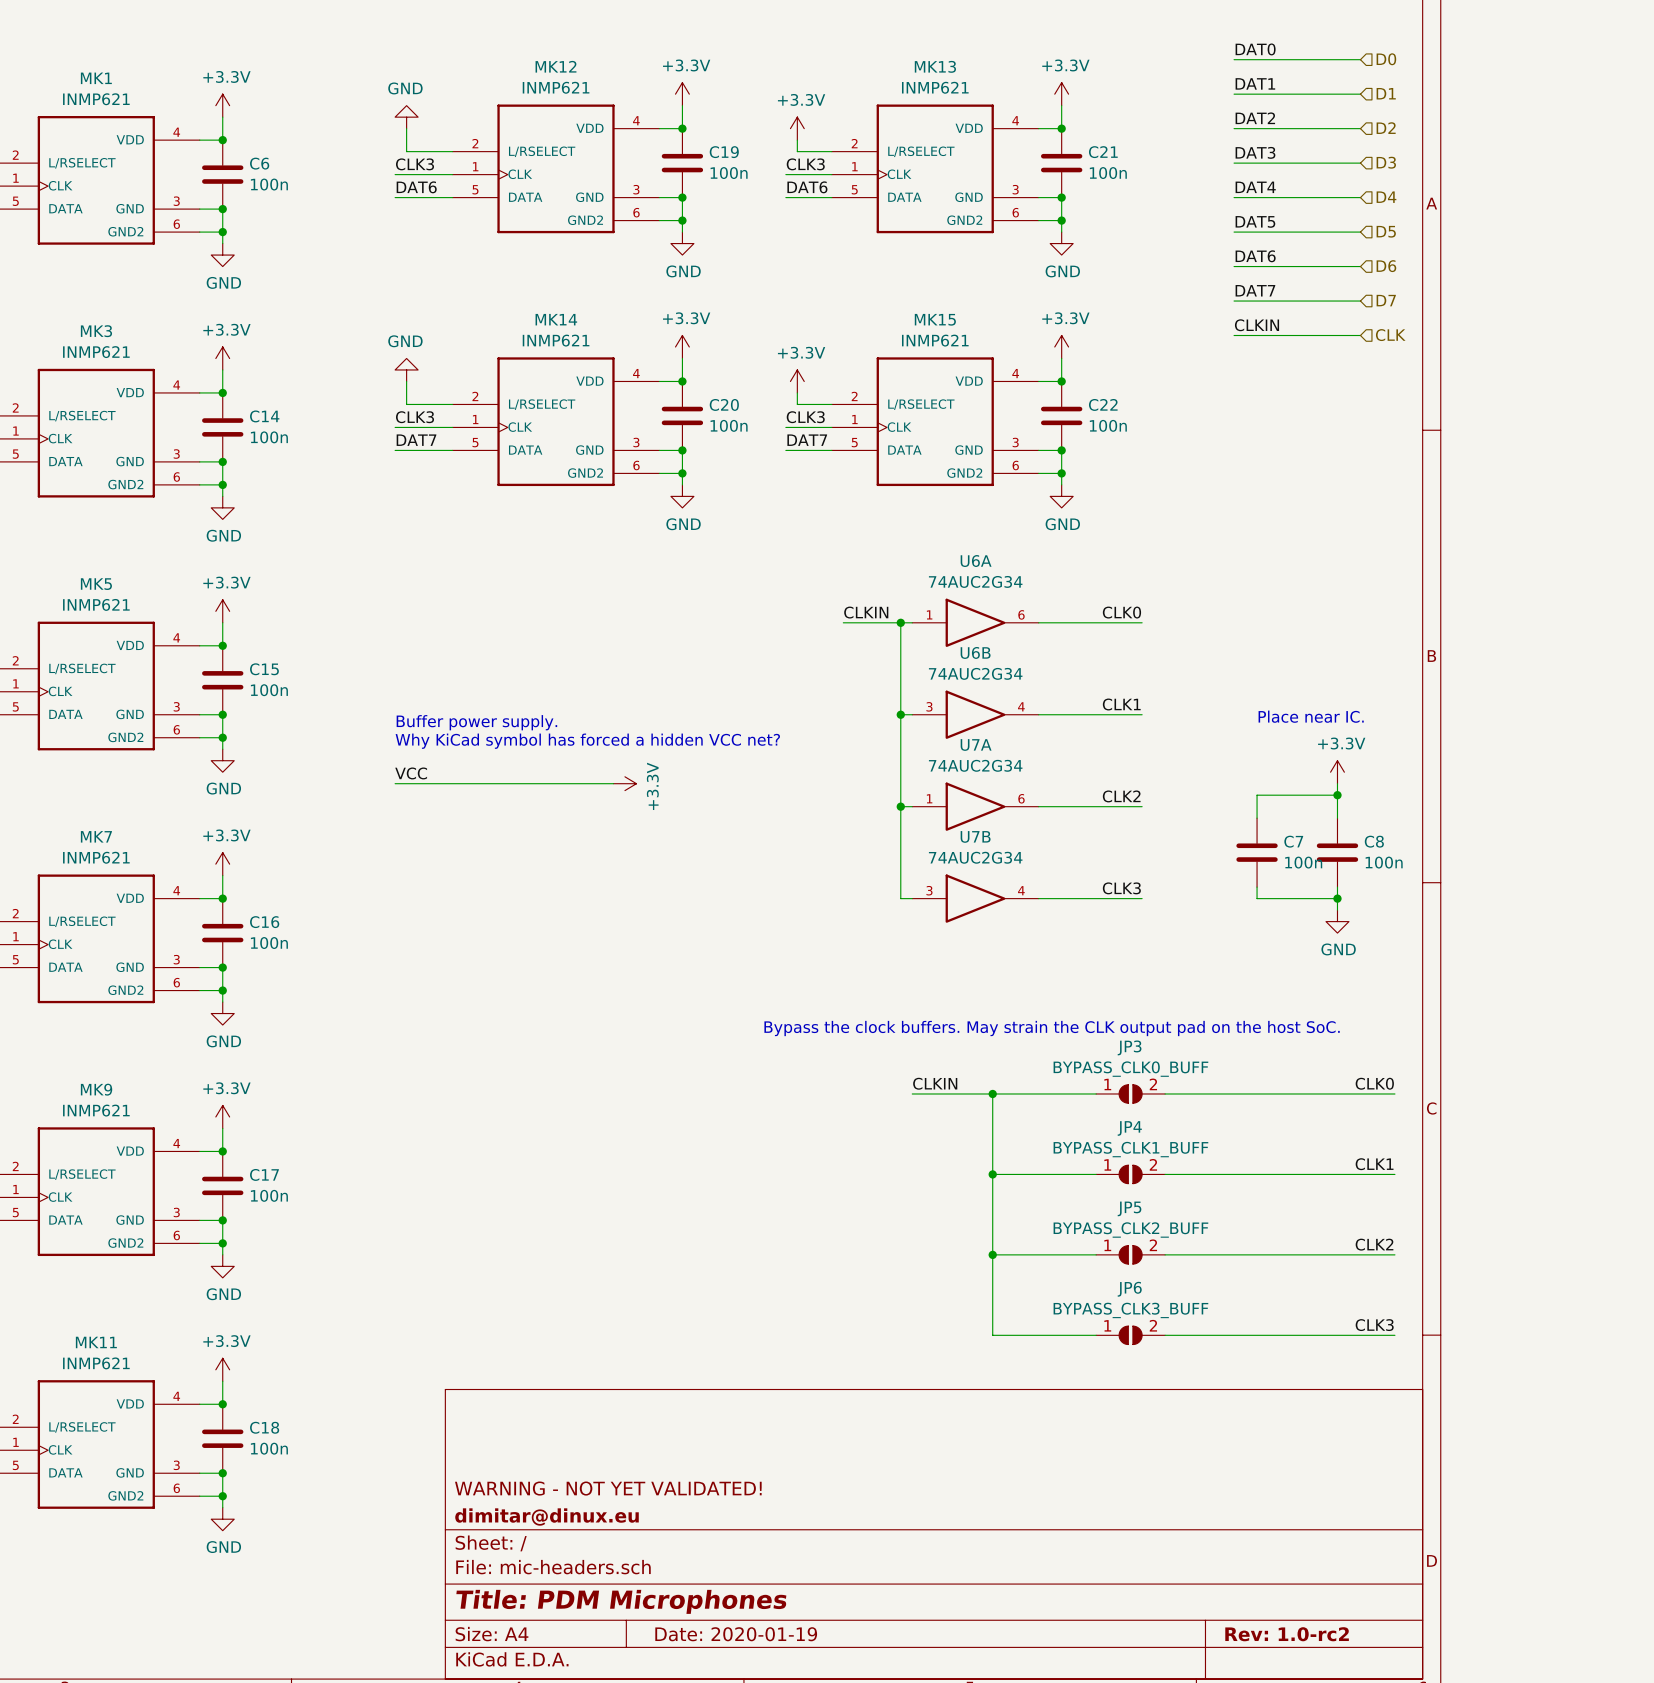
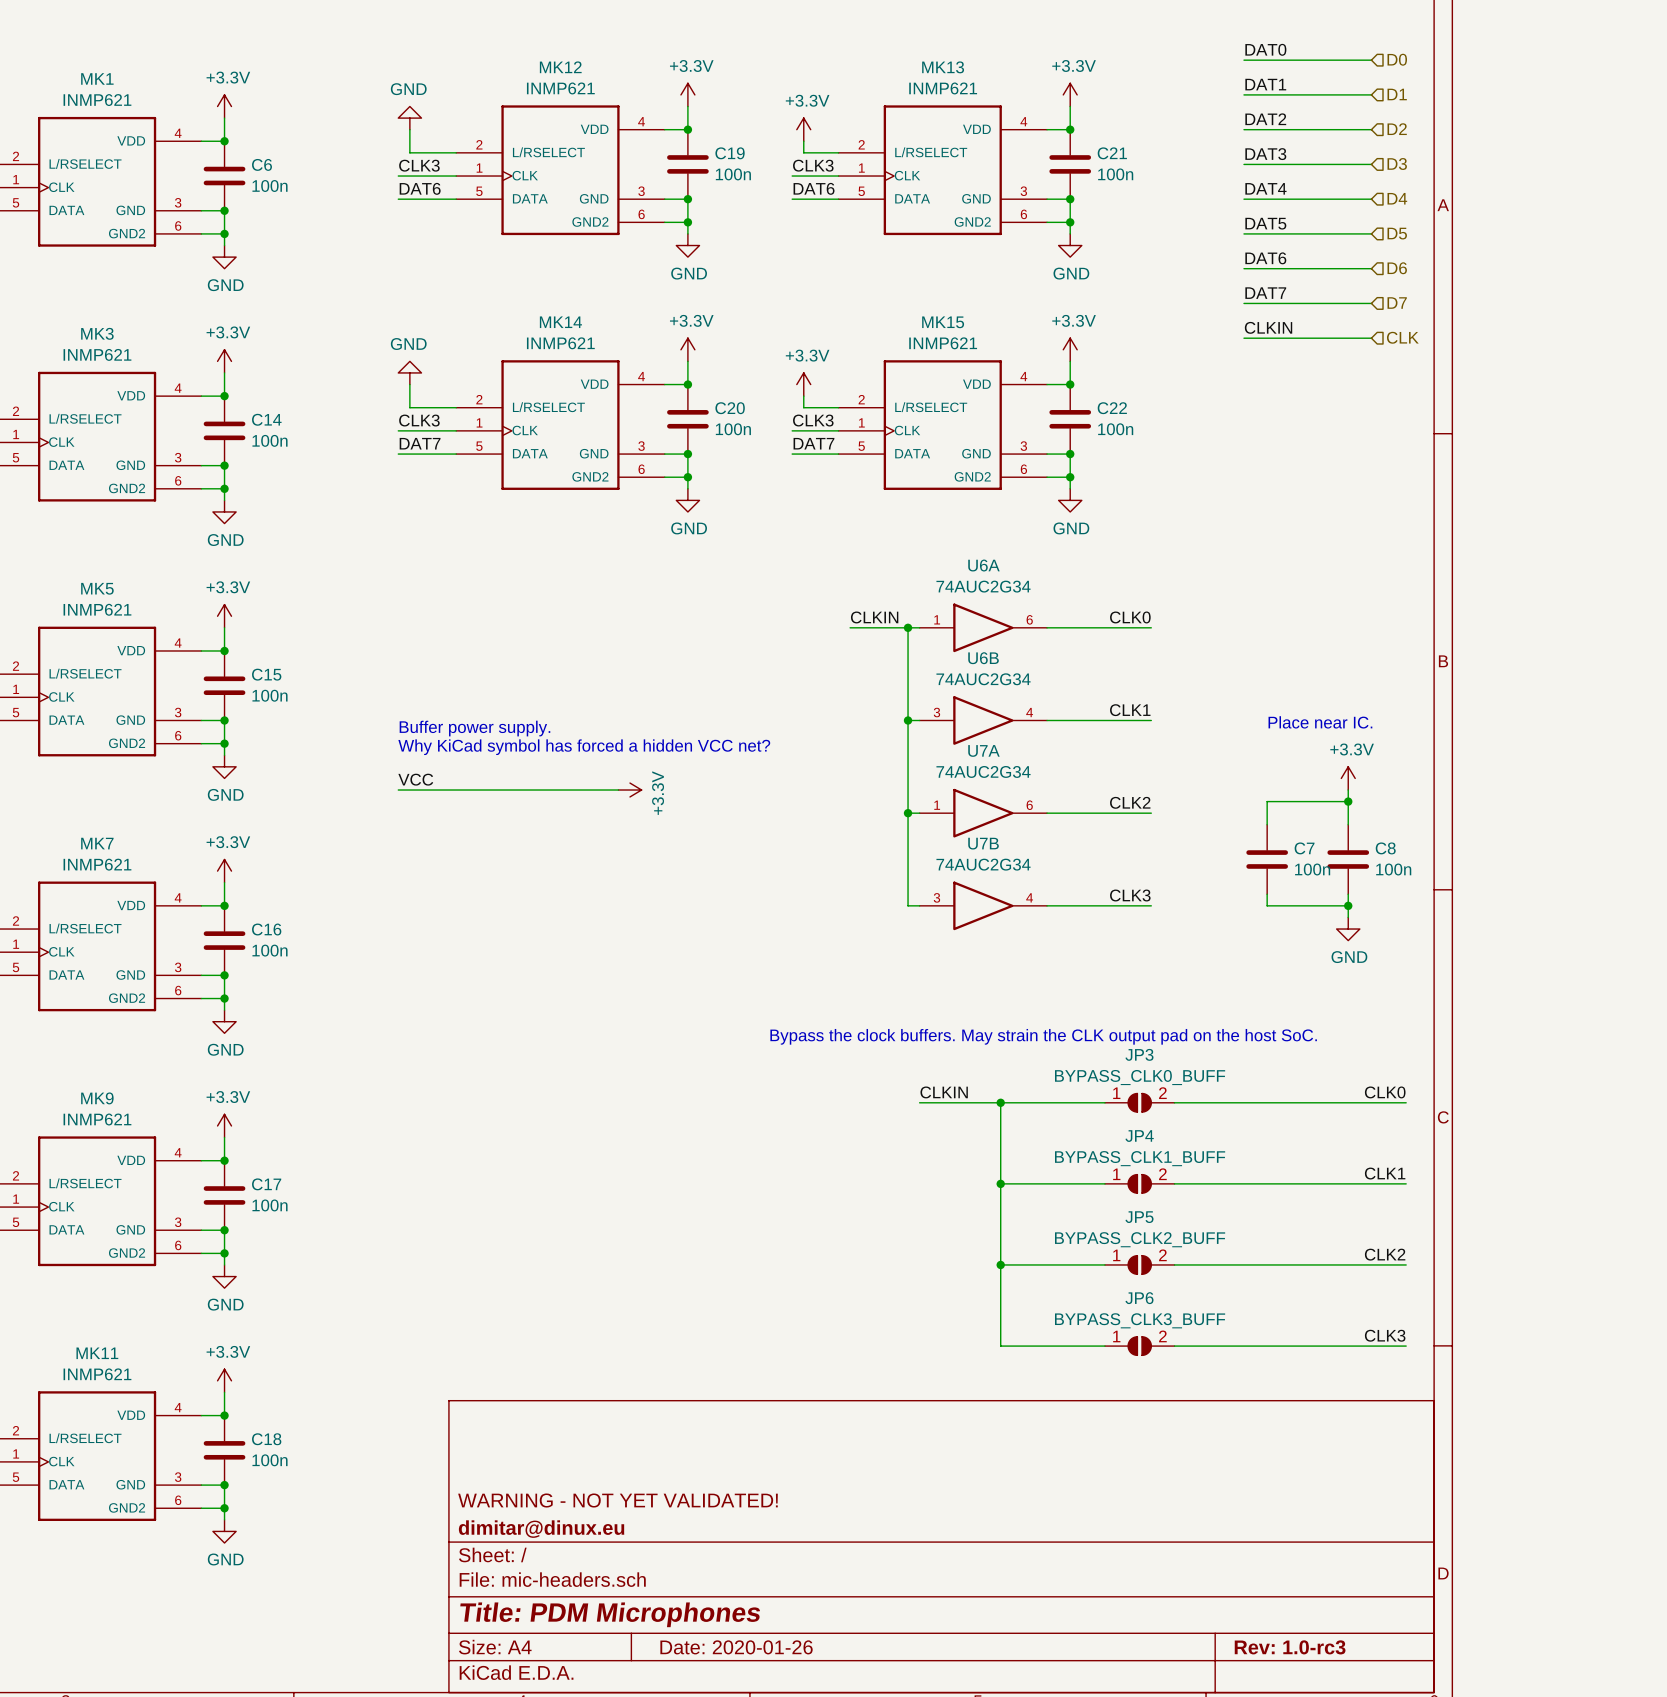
title block: Date: 2020-01-19 (736, 1634) -> Date: 2020-01-26 (736, 1647)
title block: Rev: 1.0-rc2 (1287, 1634) -> Rev: 1.0-rc3 (1290, 1647)

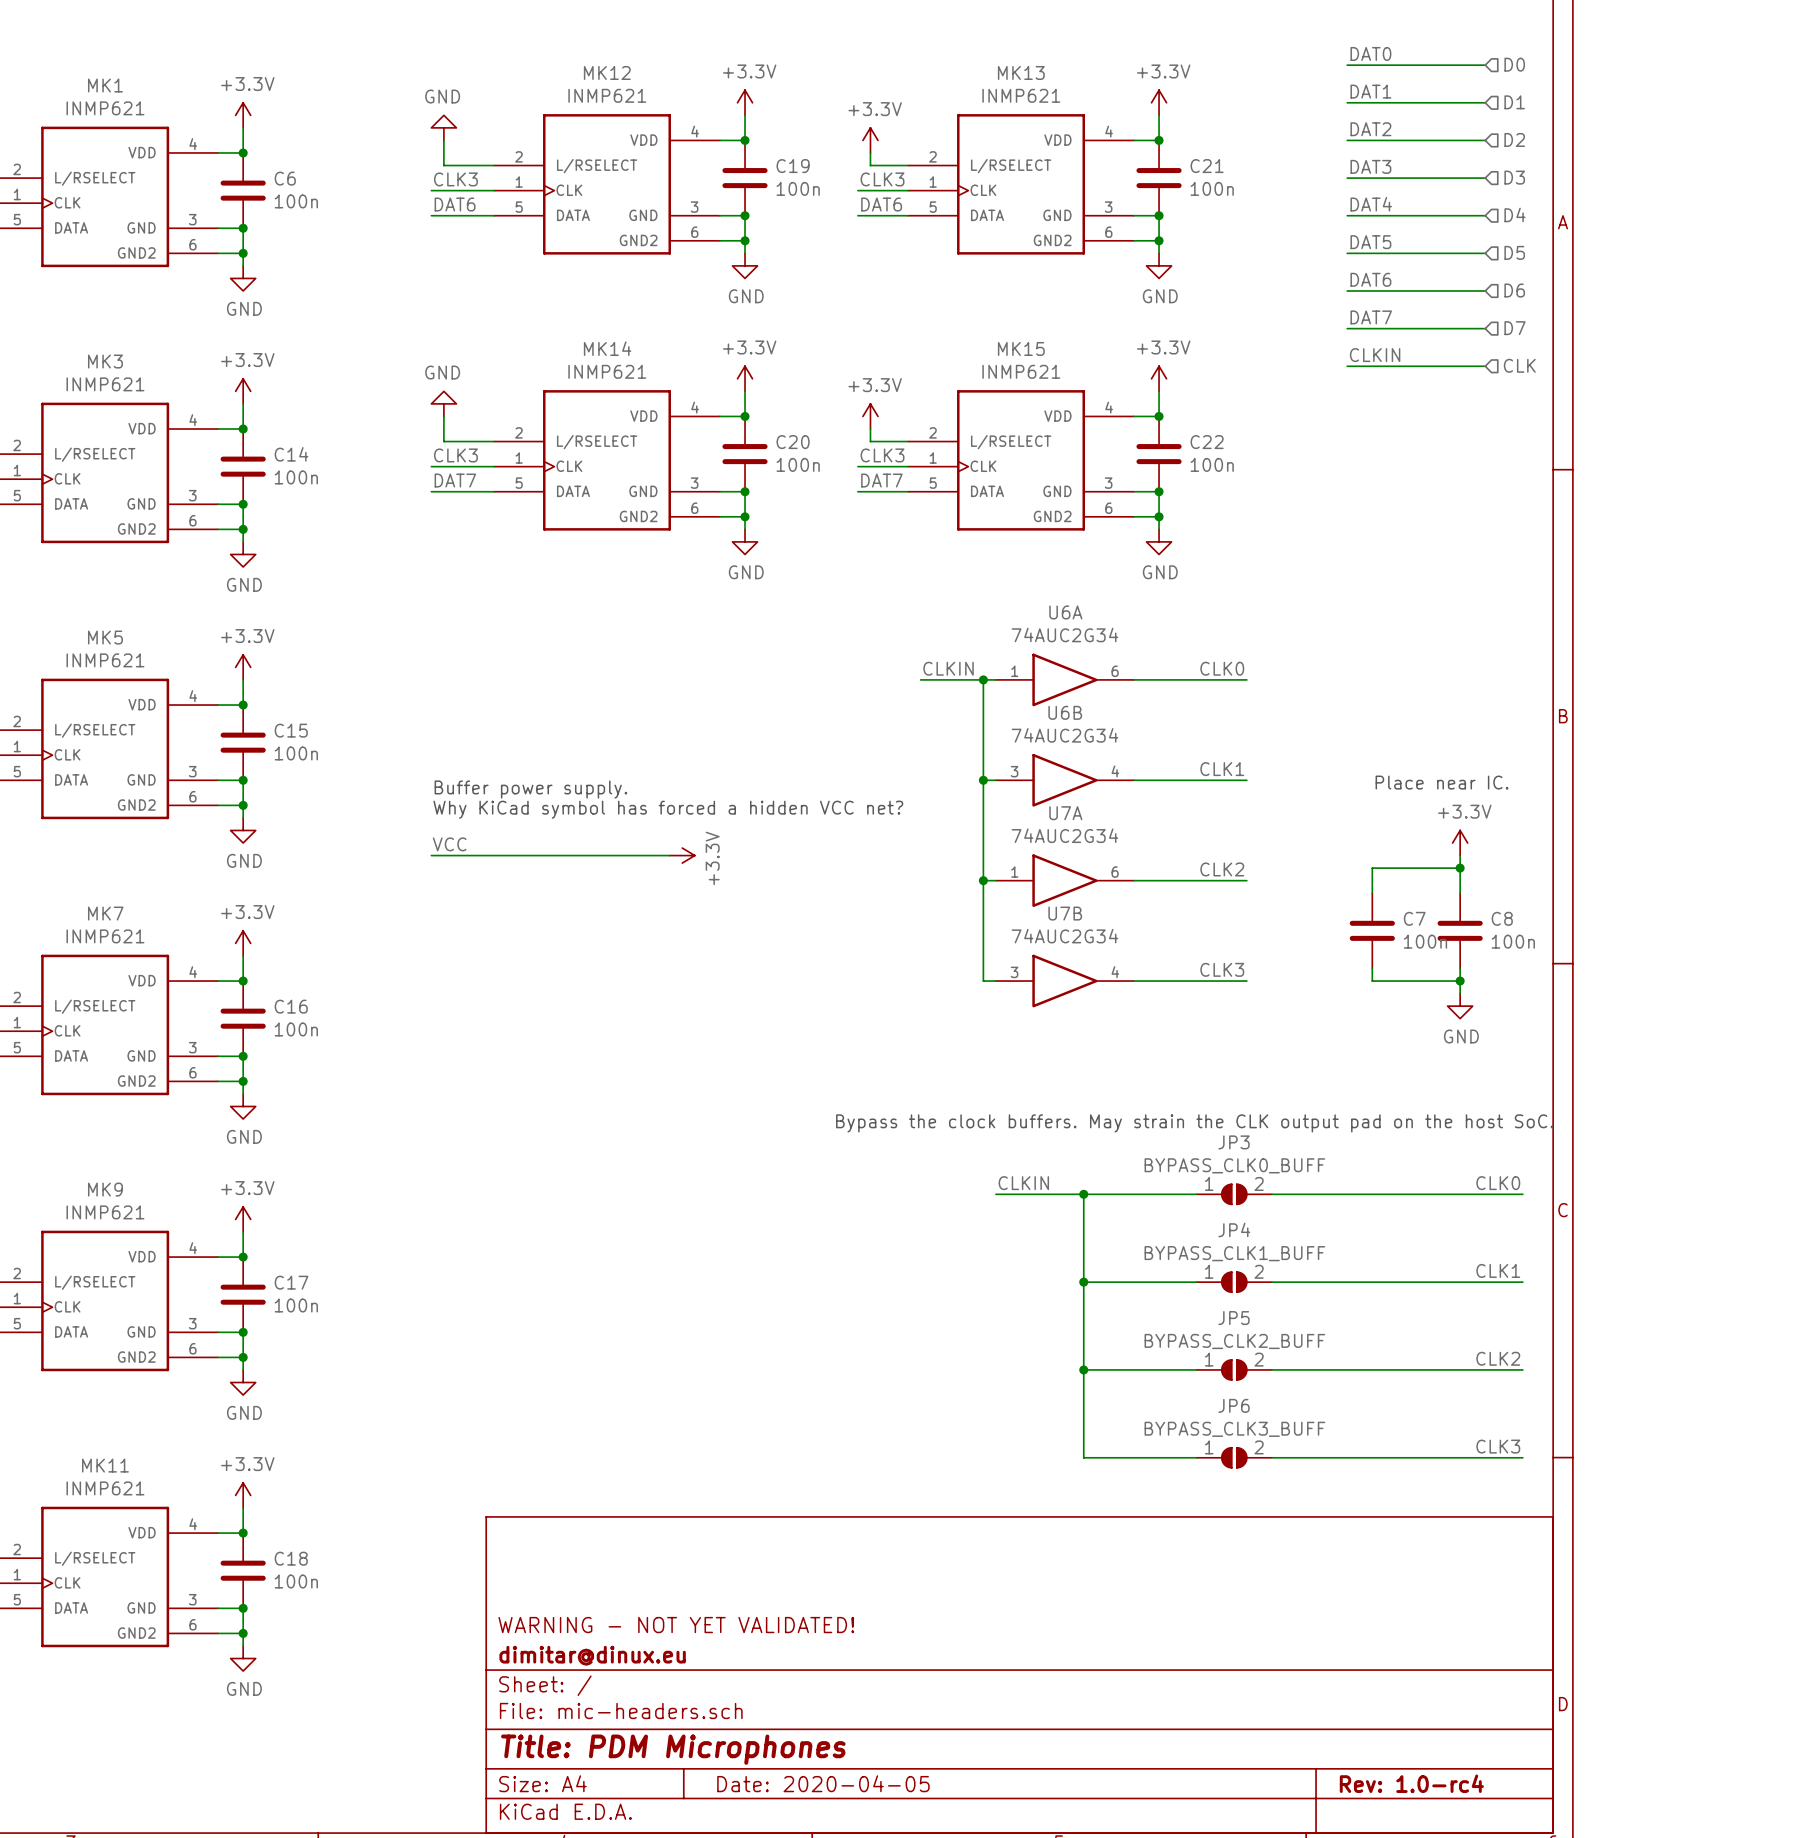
title block: Date: 2020-01-26 (736, 1647) -> Date: 2020-04-05 (823, 1783)
title block: Rev: 1.0-rc3 (1290, 1647) -> Rev: 1.0-rc4 (1411, 1783)

